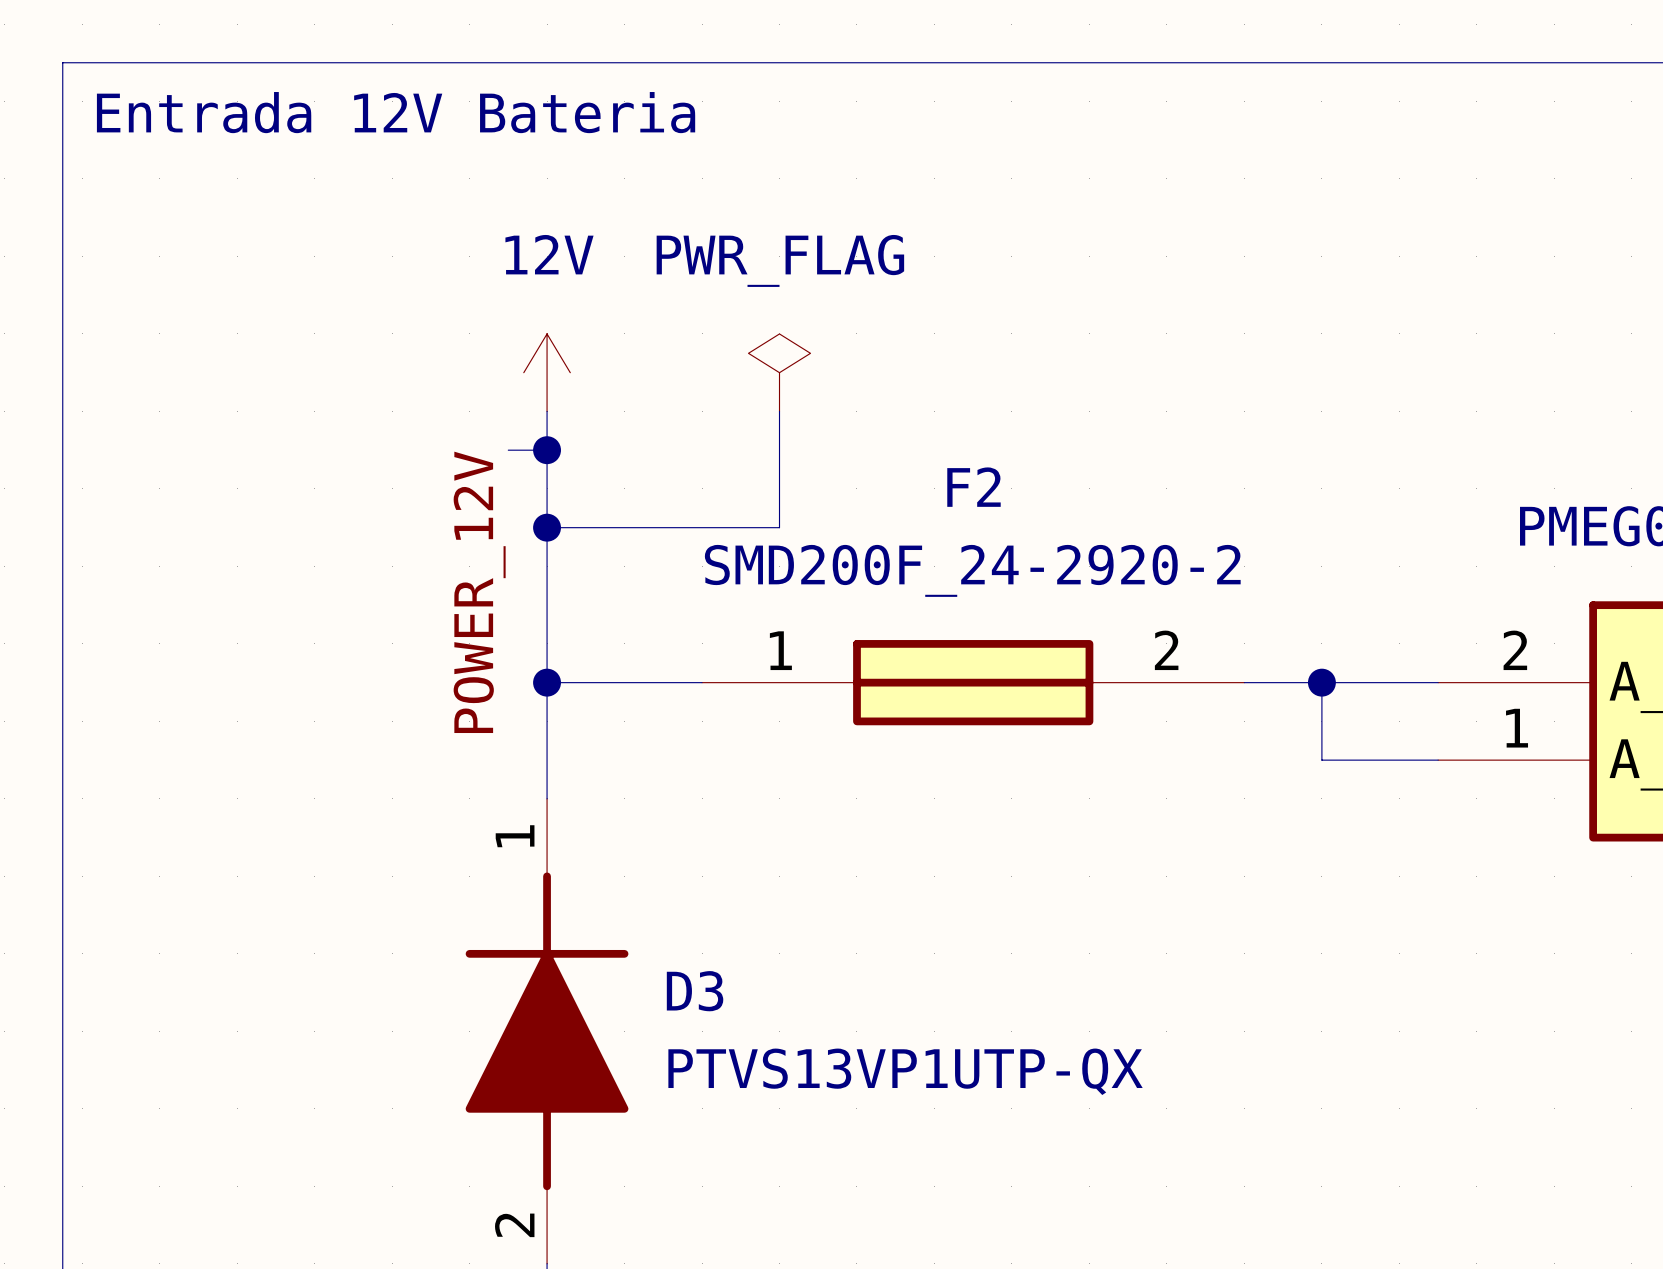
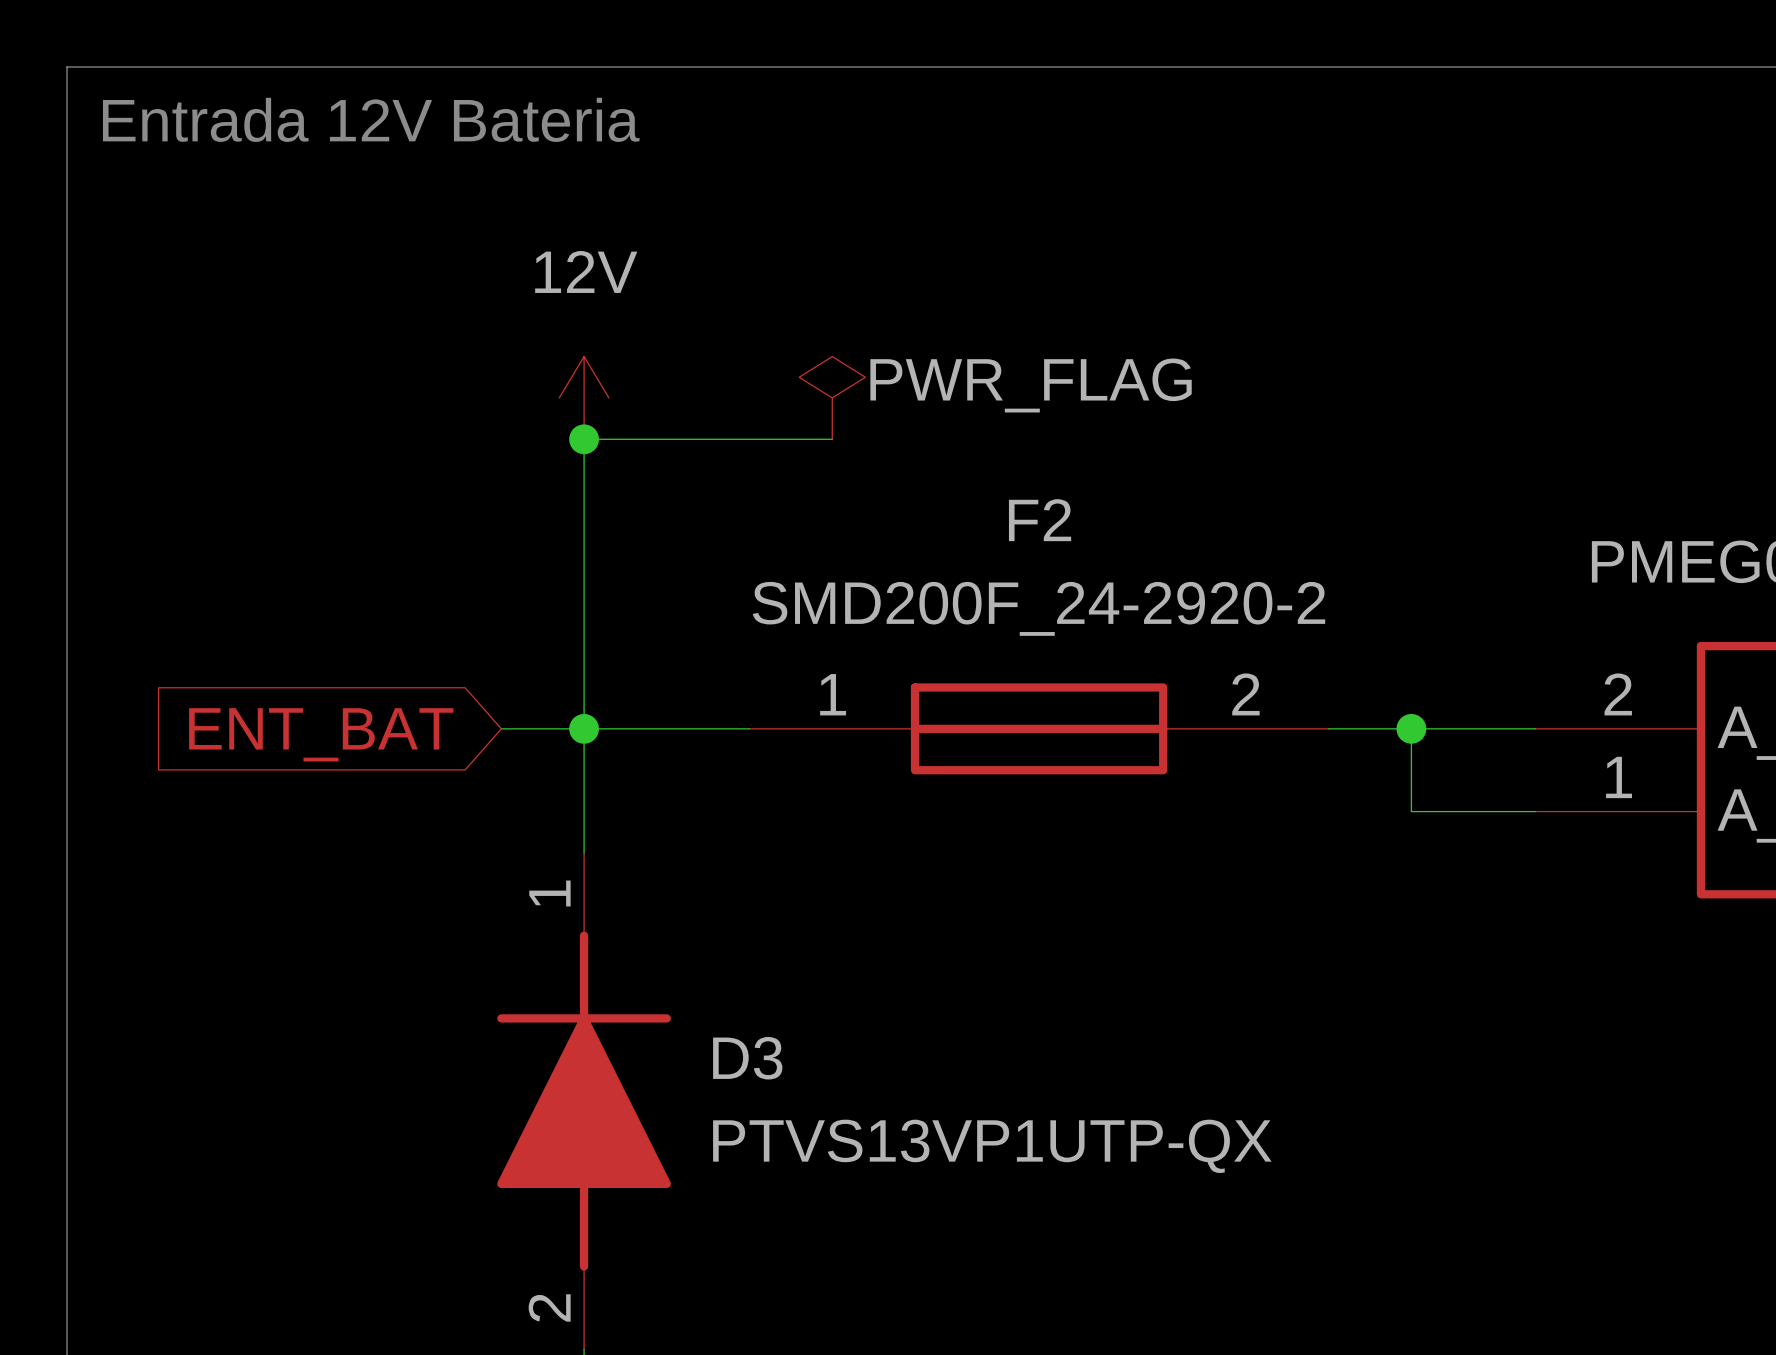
power symbol text position: PWR_FLAG (780, 260) -> PWR_FLAG (1031, 385)
wire: (779, 411) (779, 527) (547, 527) -> (832, 439) (584, 439)
wire: (508, 450) (547, 450) -> none
junction position: (547, 450) -> (584, 439)
junction: (547, 527) -> none
label: POWER_12V (479, 592) -> none
wire: none -> (501, 728) (584, 728)
global label: none -> ENT_BAT (321, 734)

